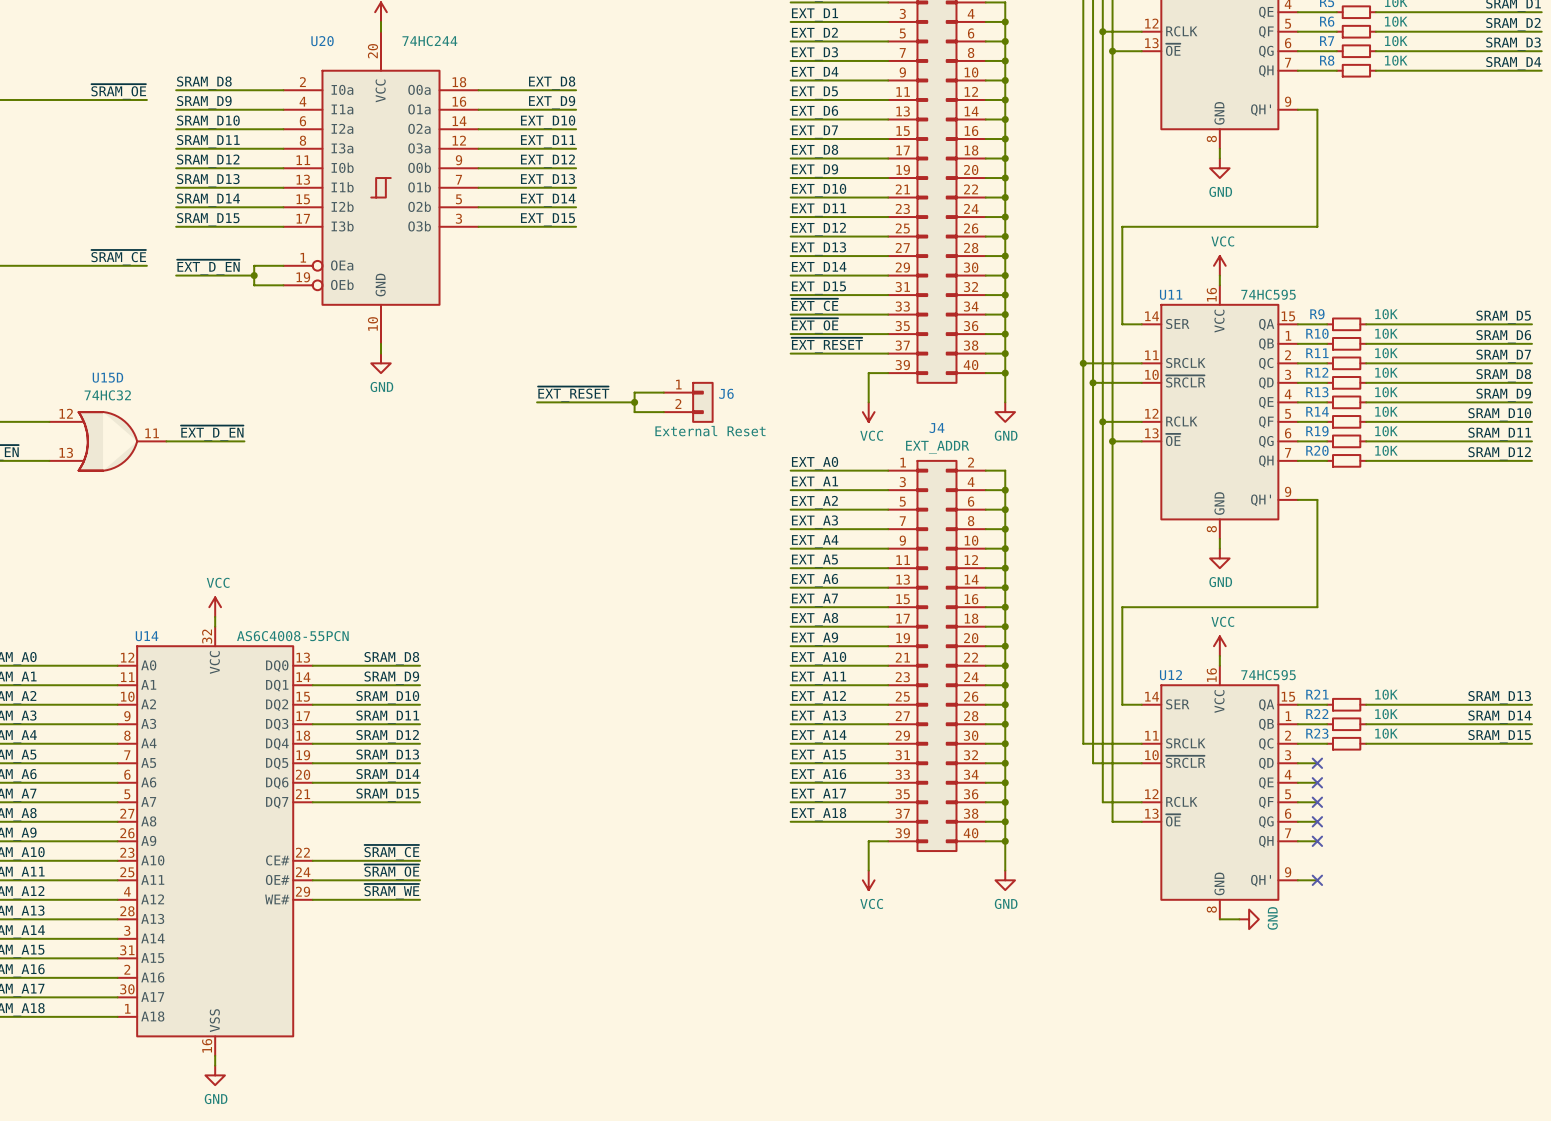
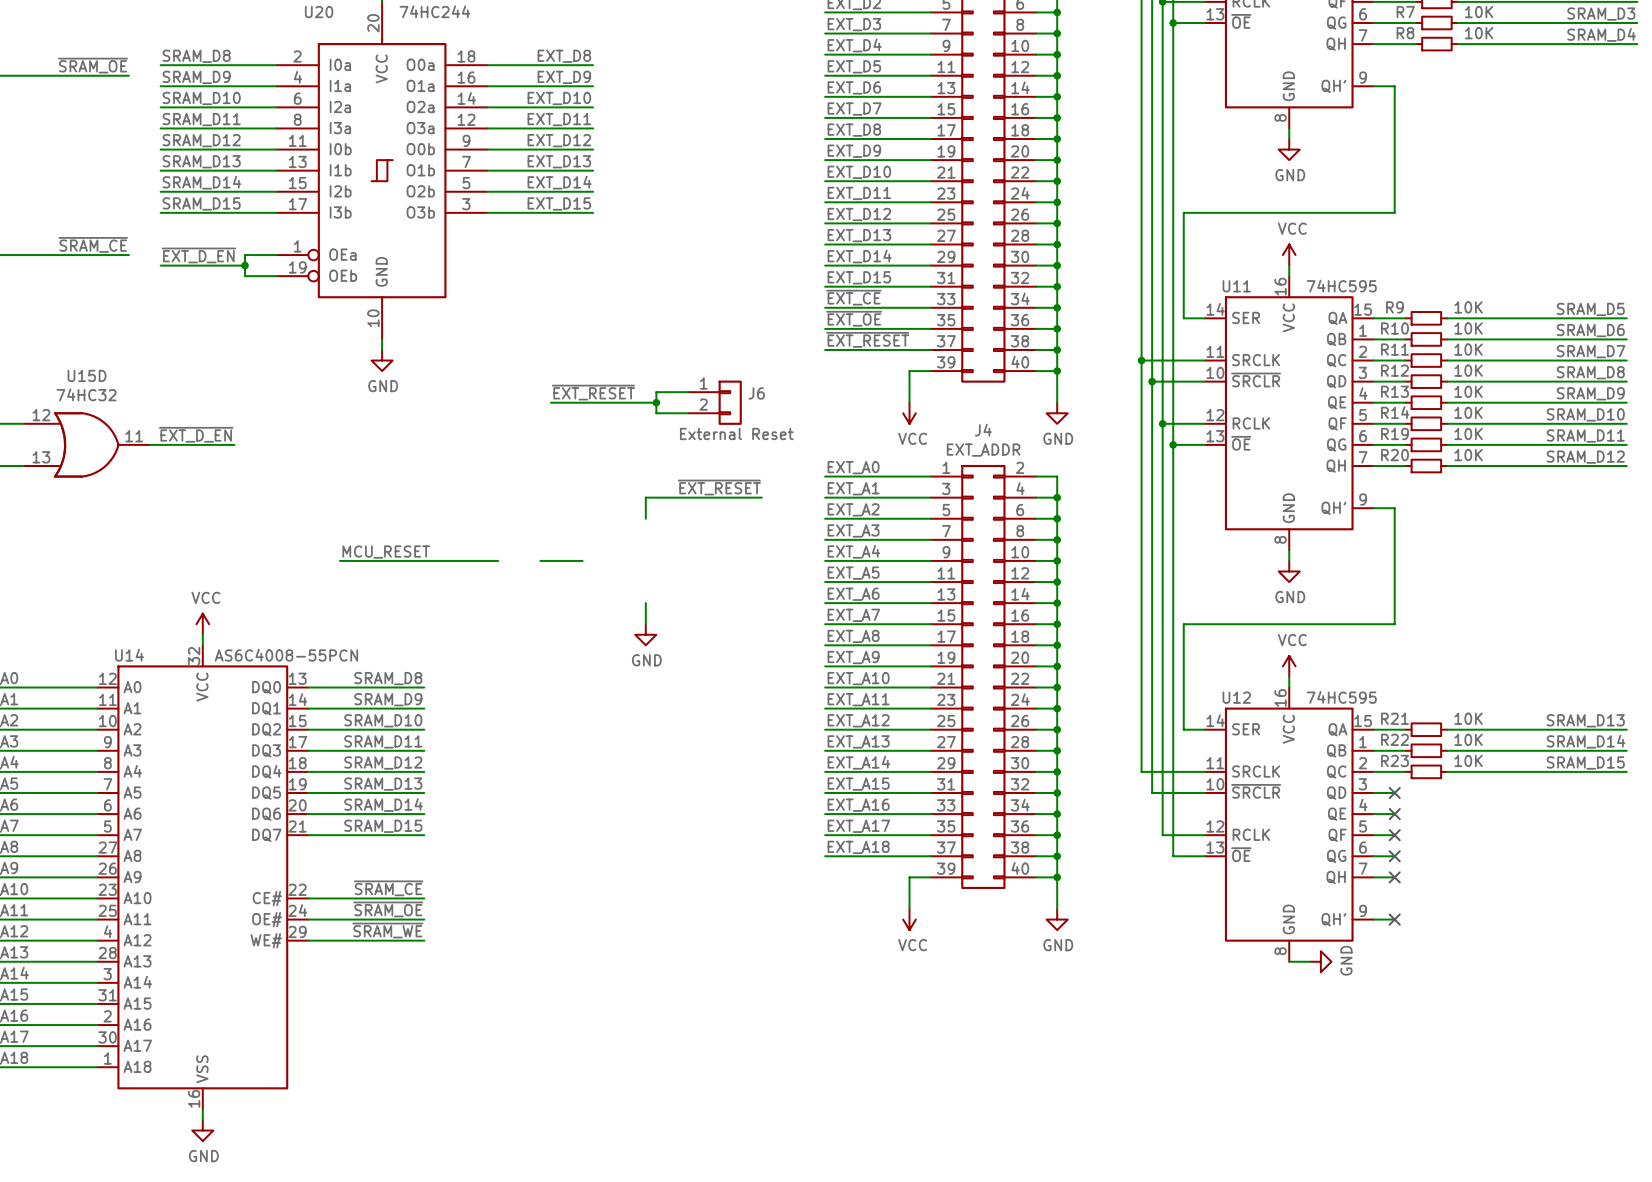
label: none -> ~{EXT_RESET} (719, 487)
wire: none -> (761, 497) (645, 497) (645, 518)
label: none -> MCU_RESET (386, 552)
wire: none -> (339, 560) (498, 560)
wire: none -> (540, 560) (582, 560)
wire: none -> (645, 603) (645, 624)
power symbol: none -> GND (645, 634)

